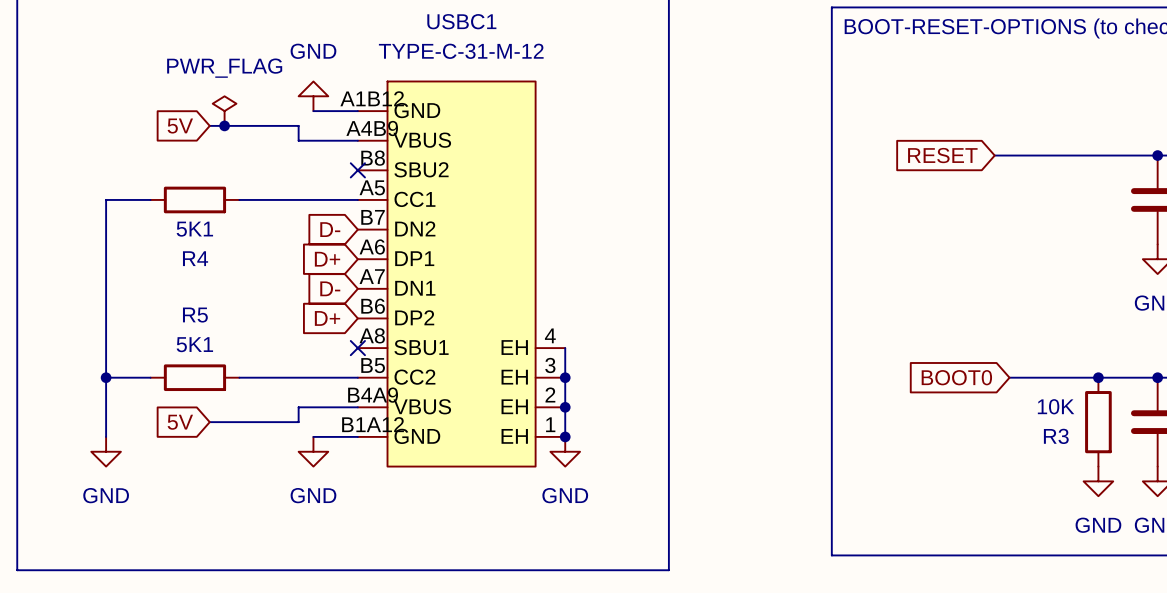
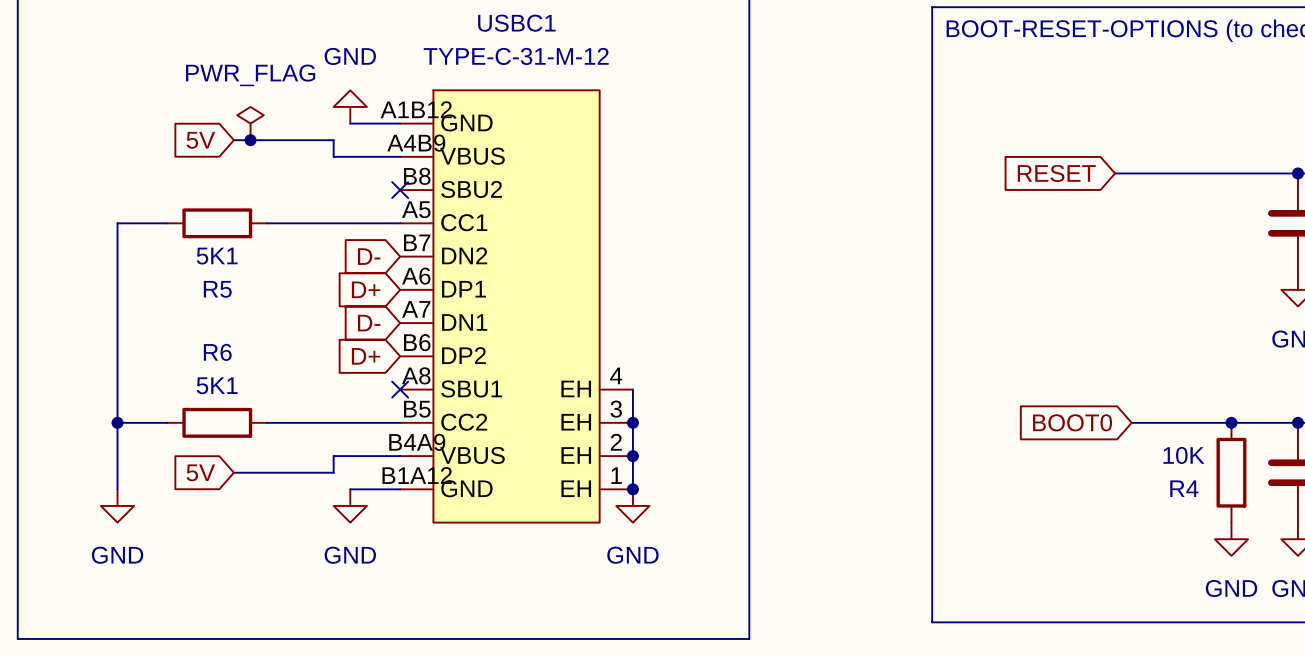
R4 name: R4 (195, 258) -> R5 (217, 289)
R5 name: R5 (195, 315) -> R6 (217, 352)
R3 name: R3 (1056, 436) -> R4 (1184, 488)

